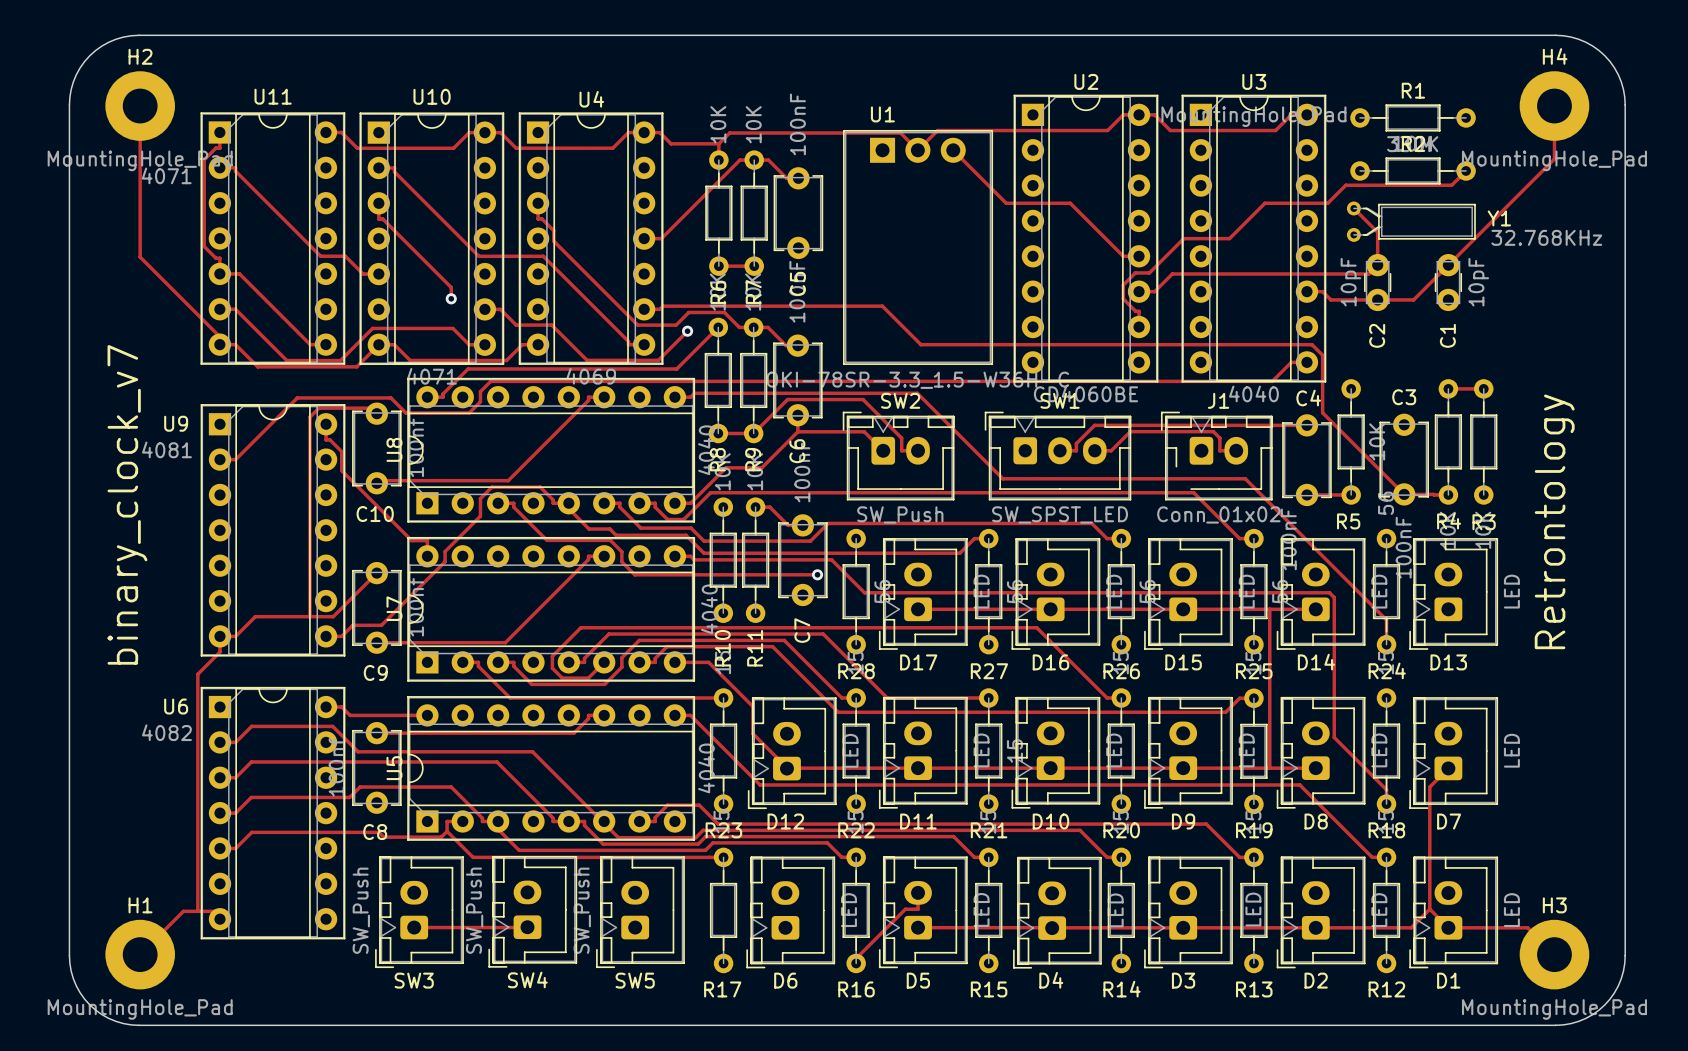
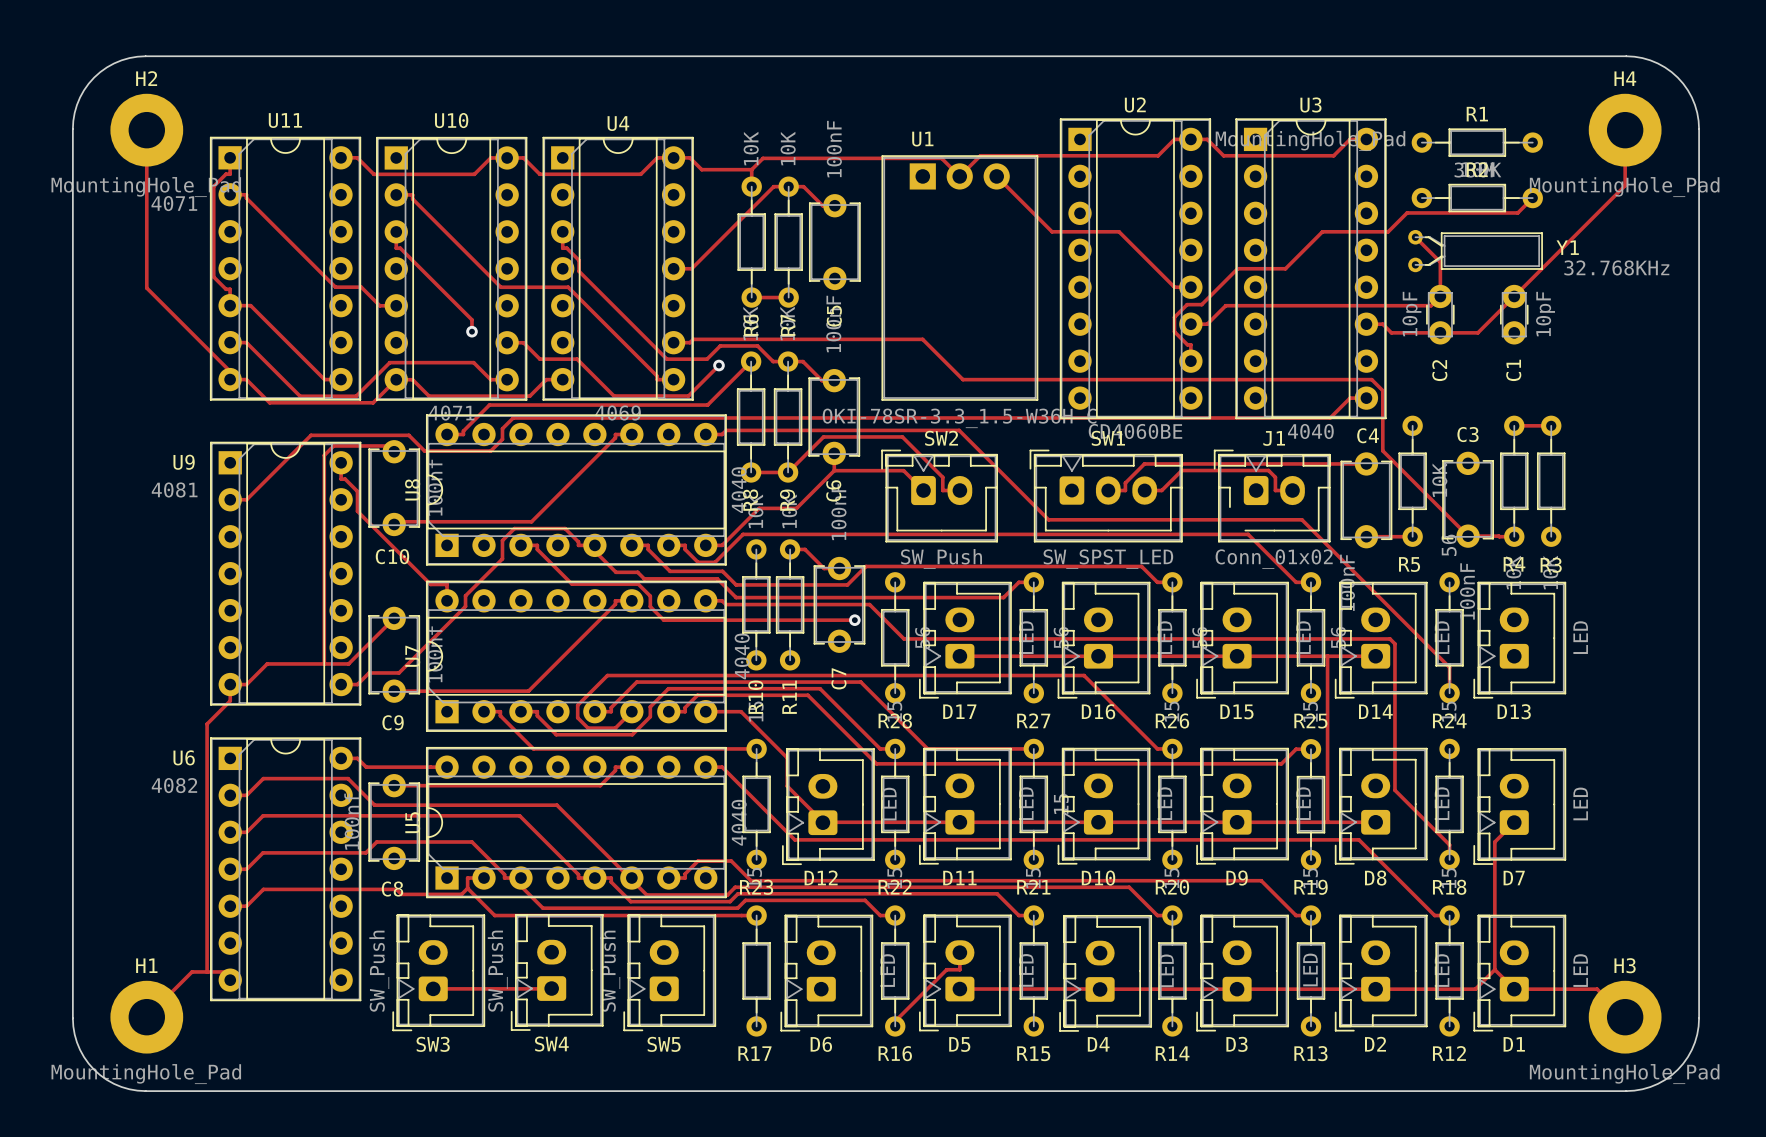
text: binary_clock_v7 (127, 504) -> none
text: Retrontology (1554, 521) -> none

